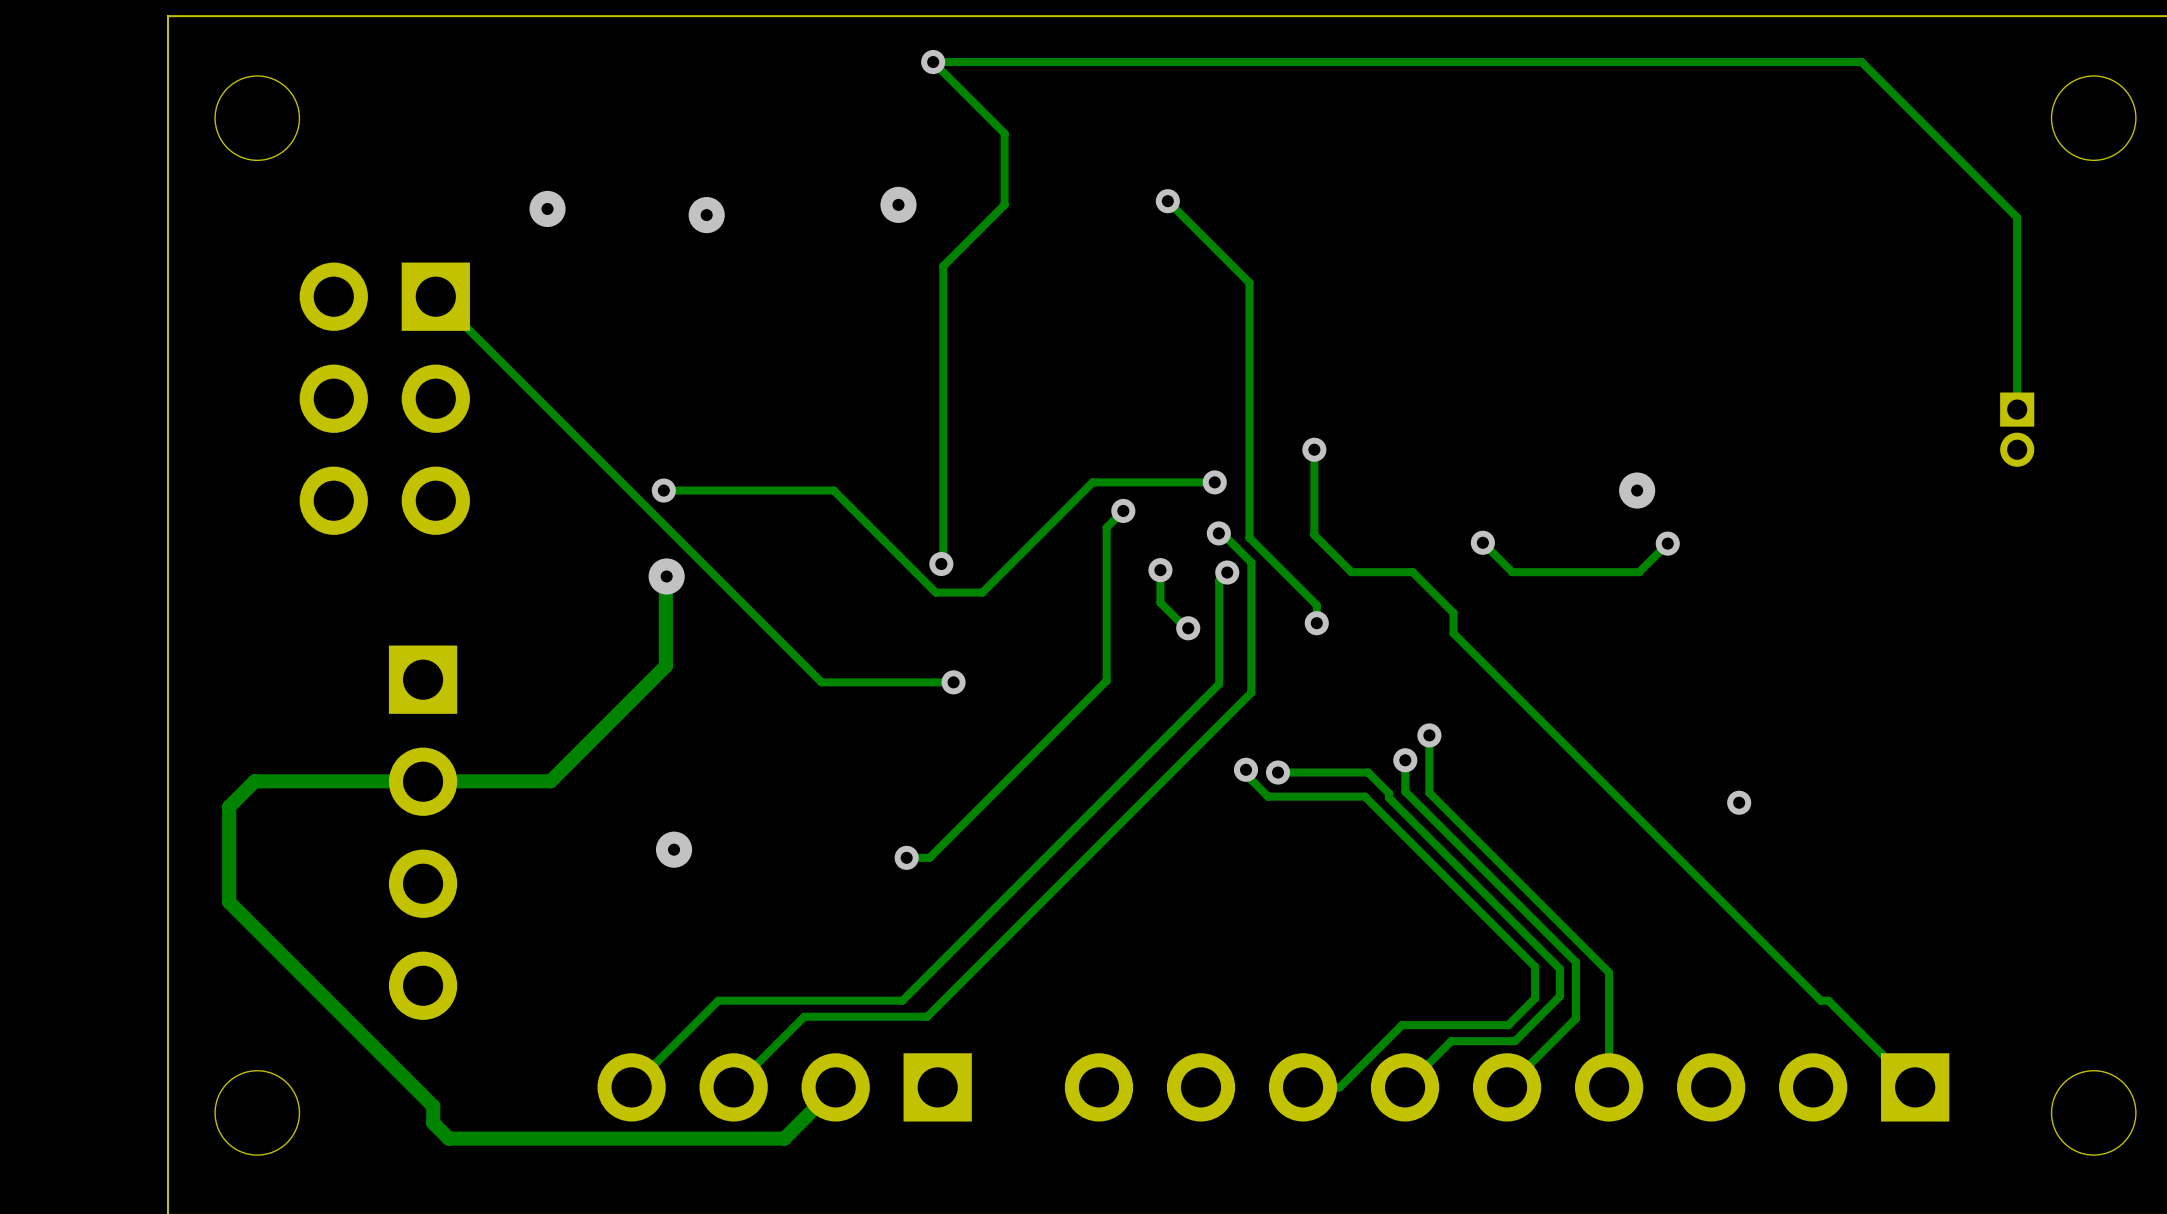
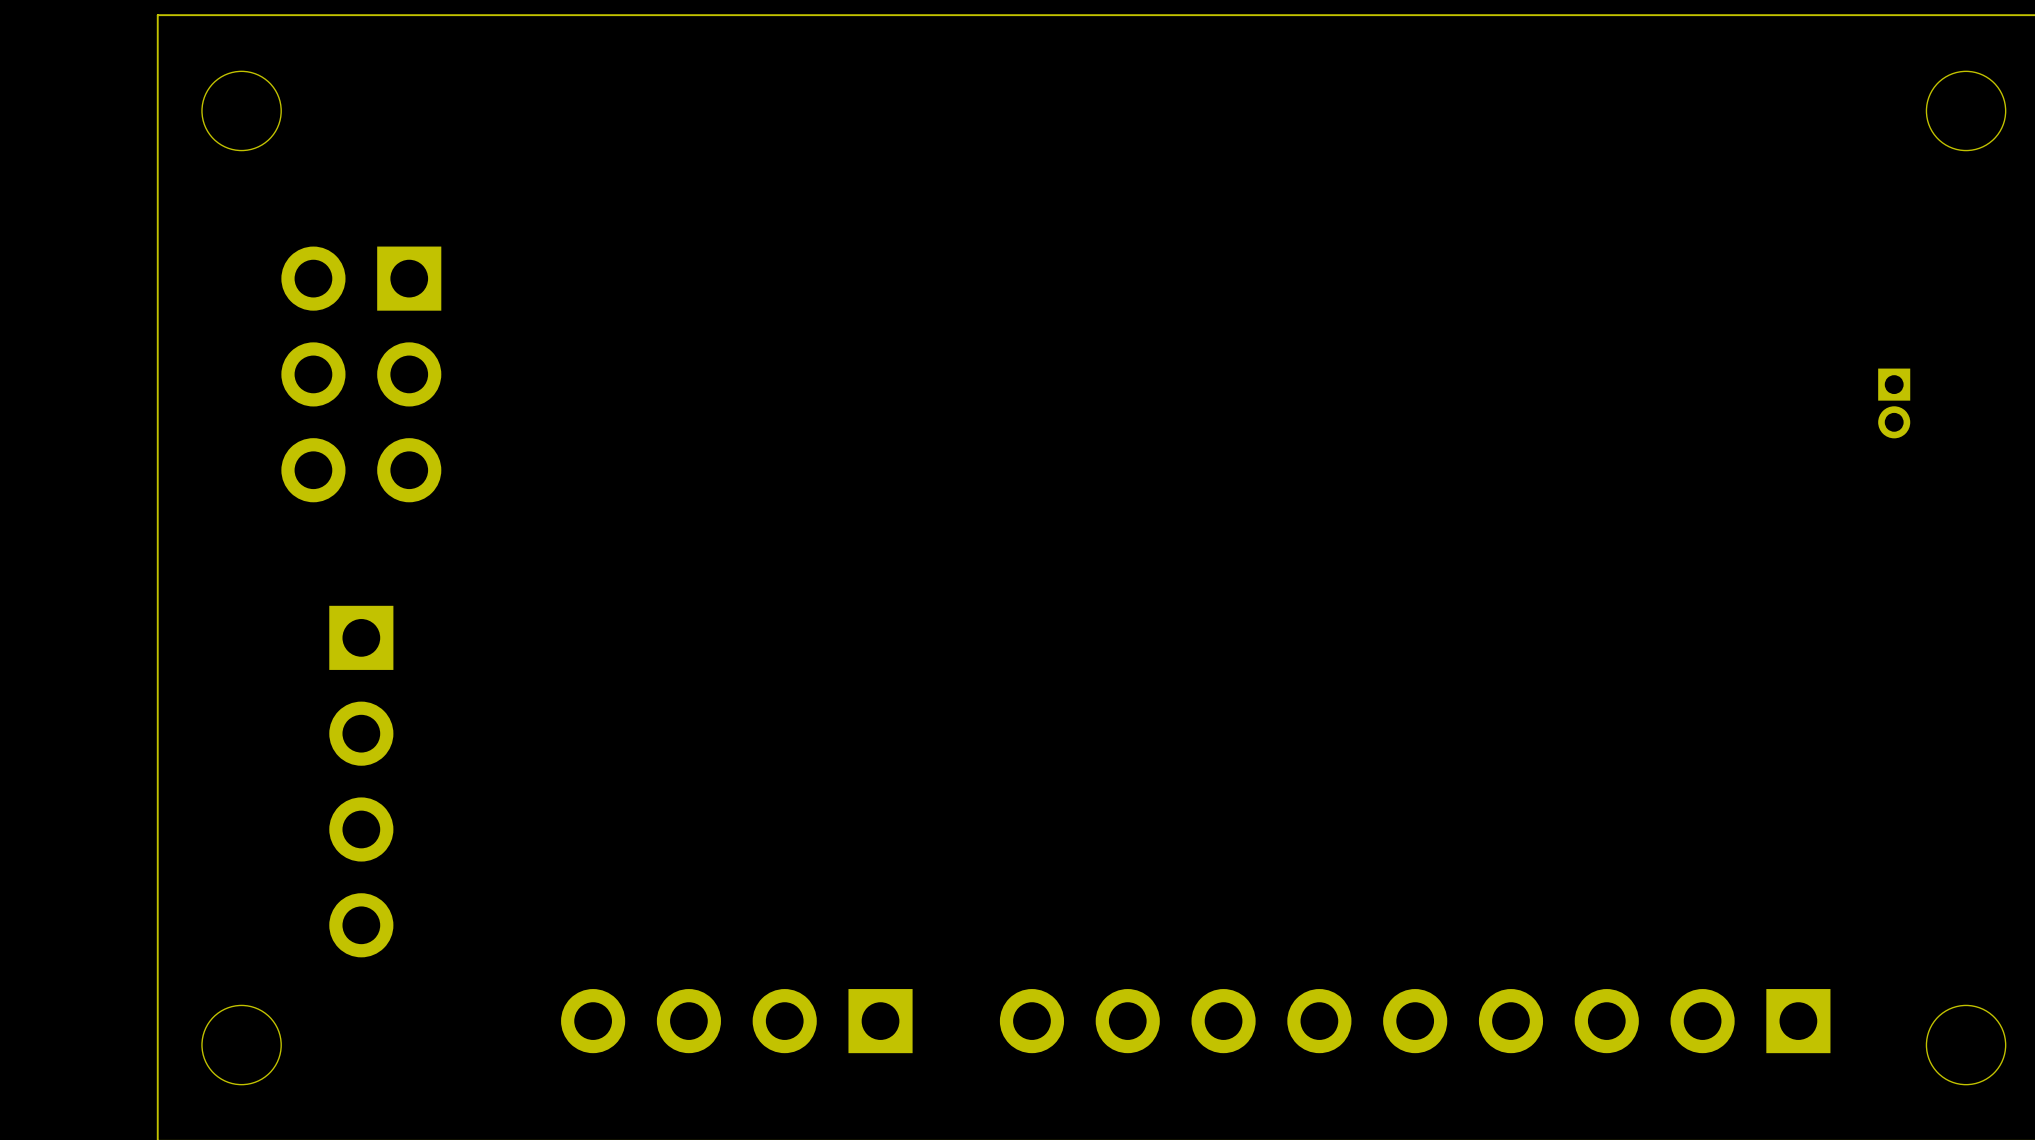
via: (933, 62) -> none
track: (1167, 201) (1249, 282) (1249, 537) (1316, 605) (1316, 623) -> none
via: (1167, 201) -> none
via: (898, 204) -> none
via: (547, 208) -> none
via: (706, 215) -> none
track: (435, 296) (821, 682) (953, 682) -> none
track: (2017, 409) (2017, 217) (1861, 62) (933, 62) (1004, 133) (1004, 204) (943, 266) (943, 561) (941, 564) -> none
track: (1314, 449) (1314, 535) (1351, 572) (1412, 572) (1453, 612) (1453, 633) (1820, 1000) (1828, 1000) (1915, 1087) -> none
via: (1314, 449) -> none
track: (1214, 482) (1092, 482) (982, 592) (935, 592) (833, 490) (663, 490) -> none
via: (1214, 482) -> none
via: (663, 490) -> none
via: (1637, 490) -> none
track: (1123, 510) (1106, 527) (1106, 680) (929, 857) (906, 857) -> none
via: (1123, 510) -> none
via: (1218, 533) -> none
track: (1221, 533) (1251, 562) (1251, 692) (927, 1016) (804, 1016) (733, 1087) -> none
track: (1482, 542) (1512, 572) (1639, 572) (1667, 543) -> none
via: (1482, 542) -> none
via: (1667, 543) -> none
via: (941, 564) -> none
track: (1160, 570) (1160, 602) (1185, 628) (1188, 628) -> none
via: (1160, 570) -> none
track: (1227, 572) (1219, 580) (1219, 684) (902, 1000) (718, 1000) (631, 1087) -> none
via: (1227, 572) -> none
track: (666, 576) (665, 666) (550, 781) (254, 781) (229, 806) (229, 902) (433, 1106) (433, 1123) (448, 1138) (784, 1138) (835, 1087) -> none
via: (666, 576) -> none
via: (1316, 623) -> none
via: (1188, 628) -> none
via: (953, 682) -> none
track: (1429, 735) (1429, 792) (1609, 972) (1609, 1087) -> none
via: (1429, 735) -> none
track: (1405, 760) (1405, 791) (1575, 962) (1575, 1018) (1507, 1087) -> none
via: (1405, 760) -> none
track: (1246, 769) (1246, 774) (1268, 796) (1364, 796) (1535, 966) (1535, 998) (1508, 1025) (1401, 1025) (1339, 1087) (1303, 1087) -> none
via: (1246, 769) -> none
track: (1278, 772) (1368, 772) (1389, 793) (1389, 798) (1559, 968) (1559, 996) (1515, 1041) (1451, 1041) (1405, 1087) -> none
via: (1278, 772) -> none
via: (1739, 802) -> none
part position: (423, 832) -> (361, 781)
via: (674, 849) -> none
via: (906, 857) -> none

